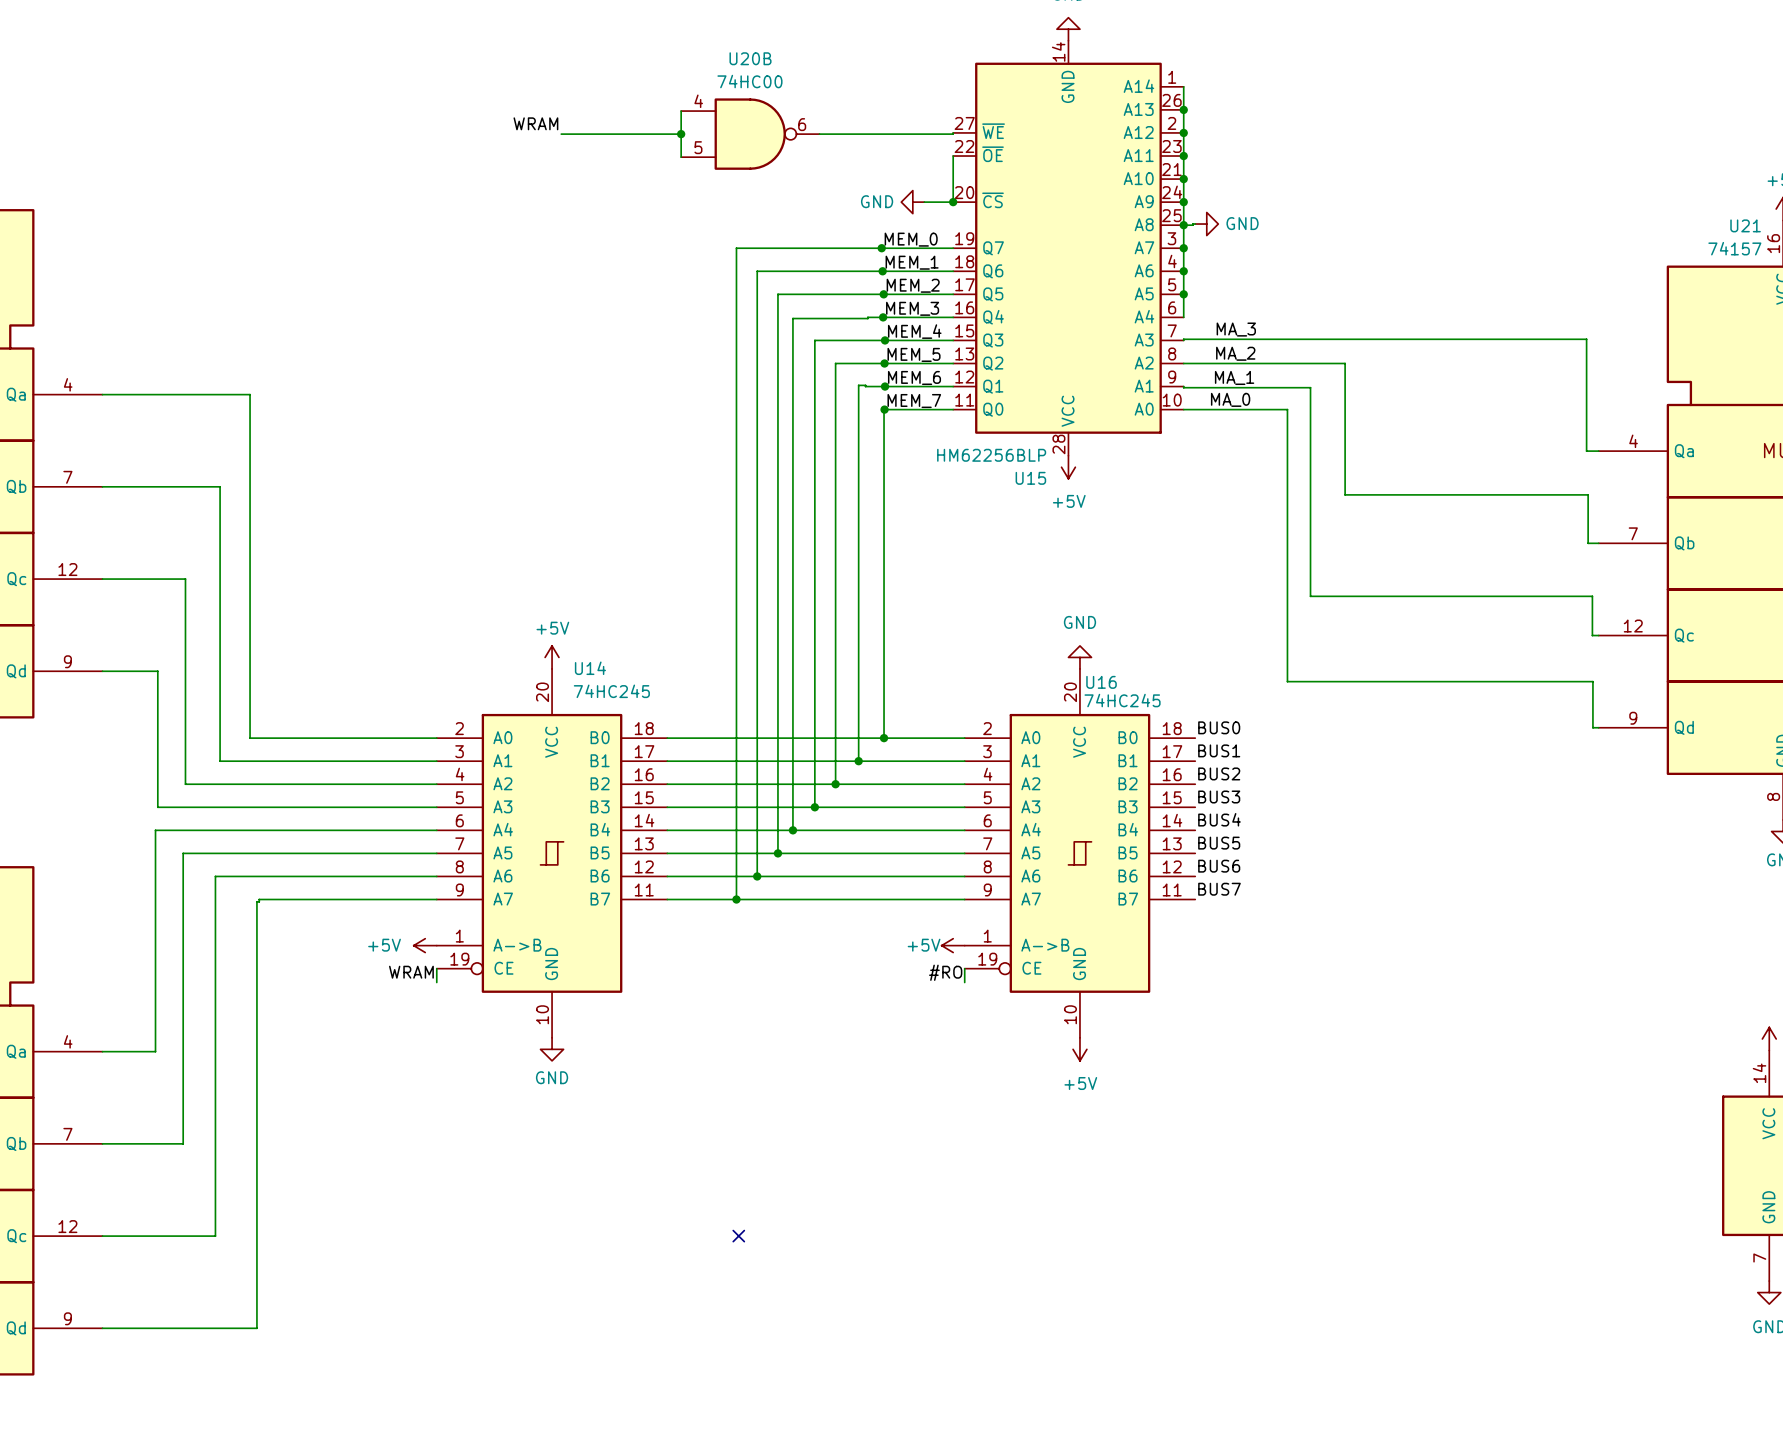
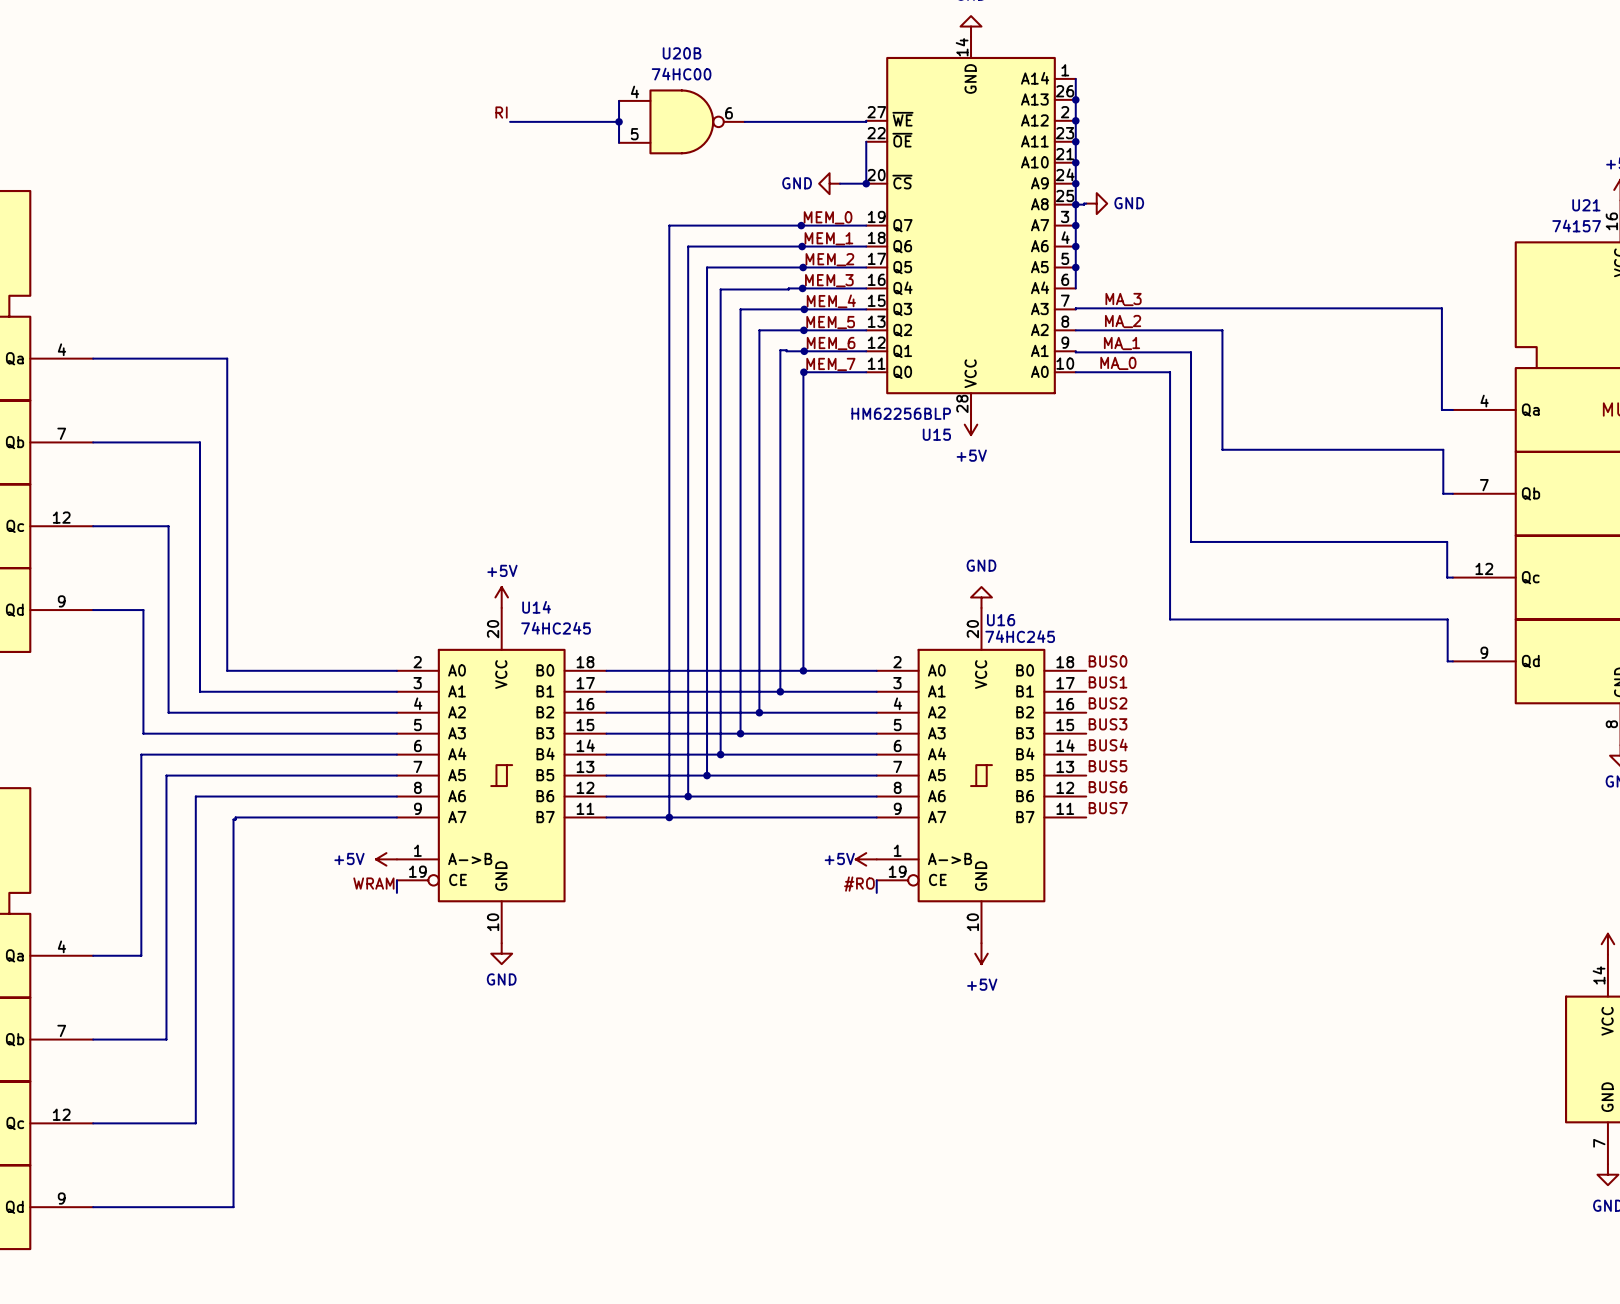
label: WRAM (535, 123) -> RI (501, 112)
no-connect mark: (738, 1236) -> none

